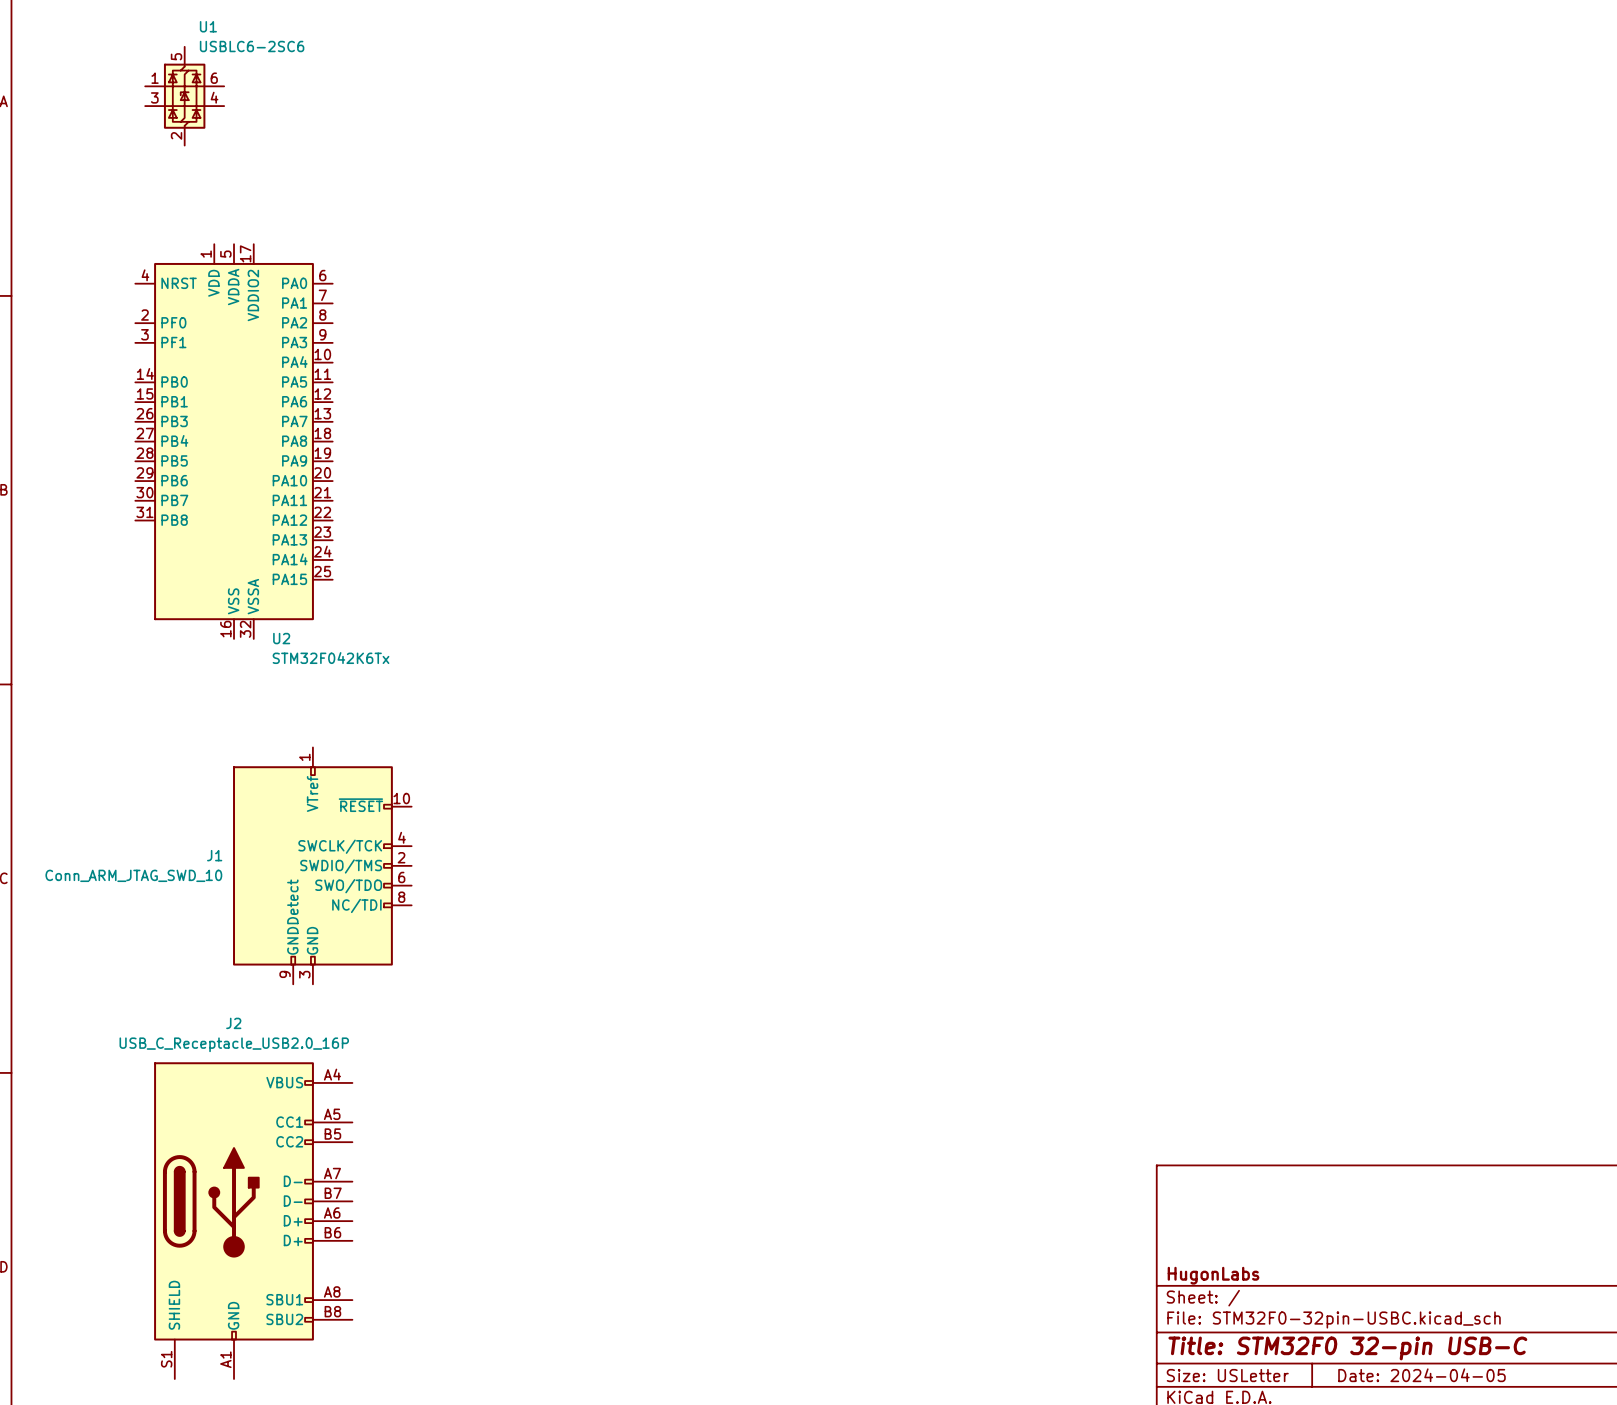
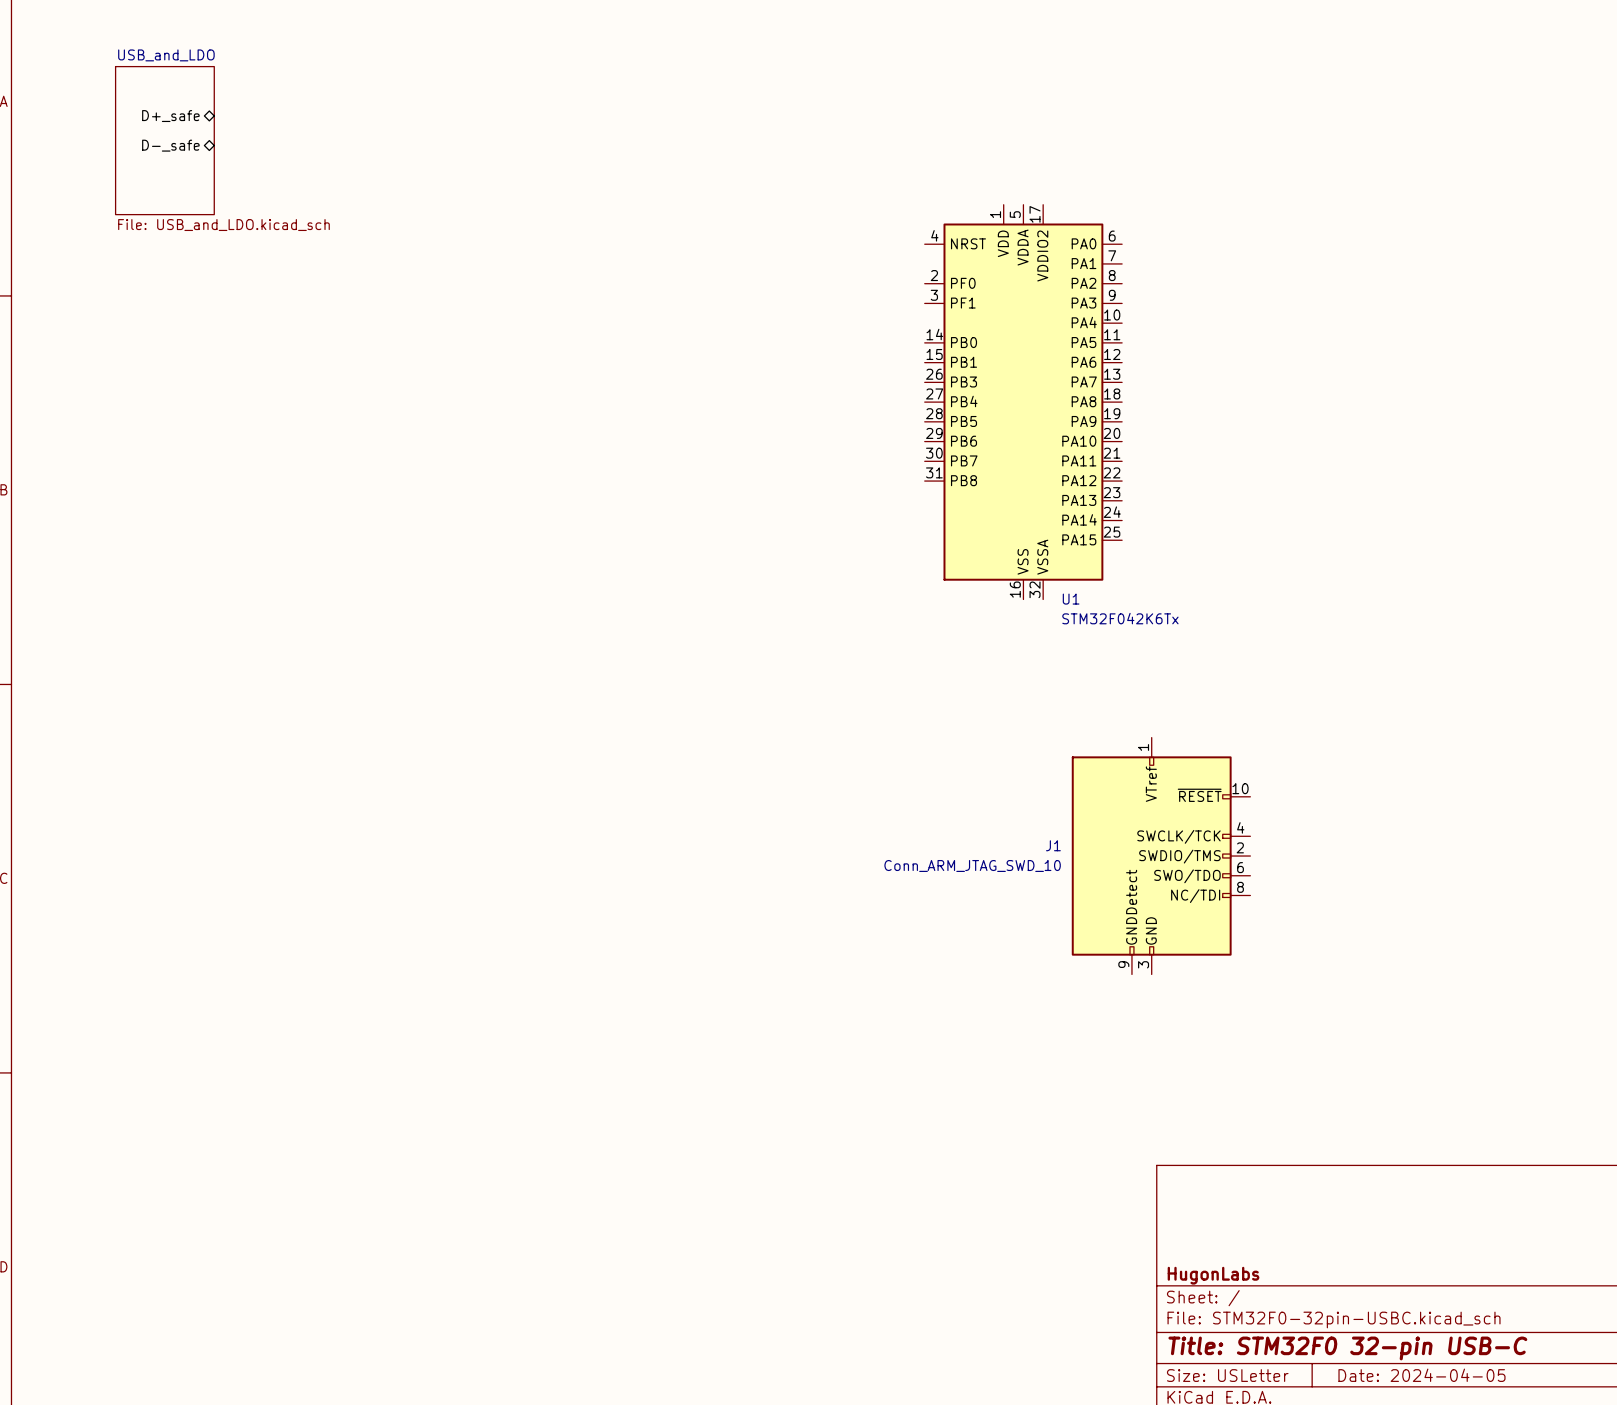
U1 name position: U1 (208, 26) -> U1 (1071, 599)
U1 symbol: [145, 46, 225, 146] -> [924, 204, 1123, 600]
U1 value: USBLC6-2SC6 (252, 46) -> STM32F042K6Tx (1120, 618)
sheet pin: none -> D+_safe (170, 116)
sheet USB_and_LDO: none -> File: USB_and_LDO.kicad_sch (164, 140)
sheet pin: none -> D-_safe (170, 145)
U2: STM32F042K6Tx (234, 441) -> none
J1 position: (322, 865) -> (1161, 856)
J2: USB_C_Receptacle_USB2.0_16P (253, 1220) -> none

